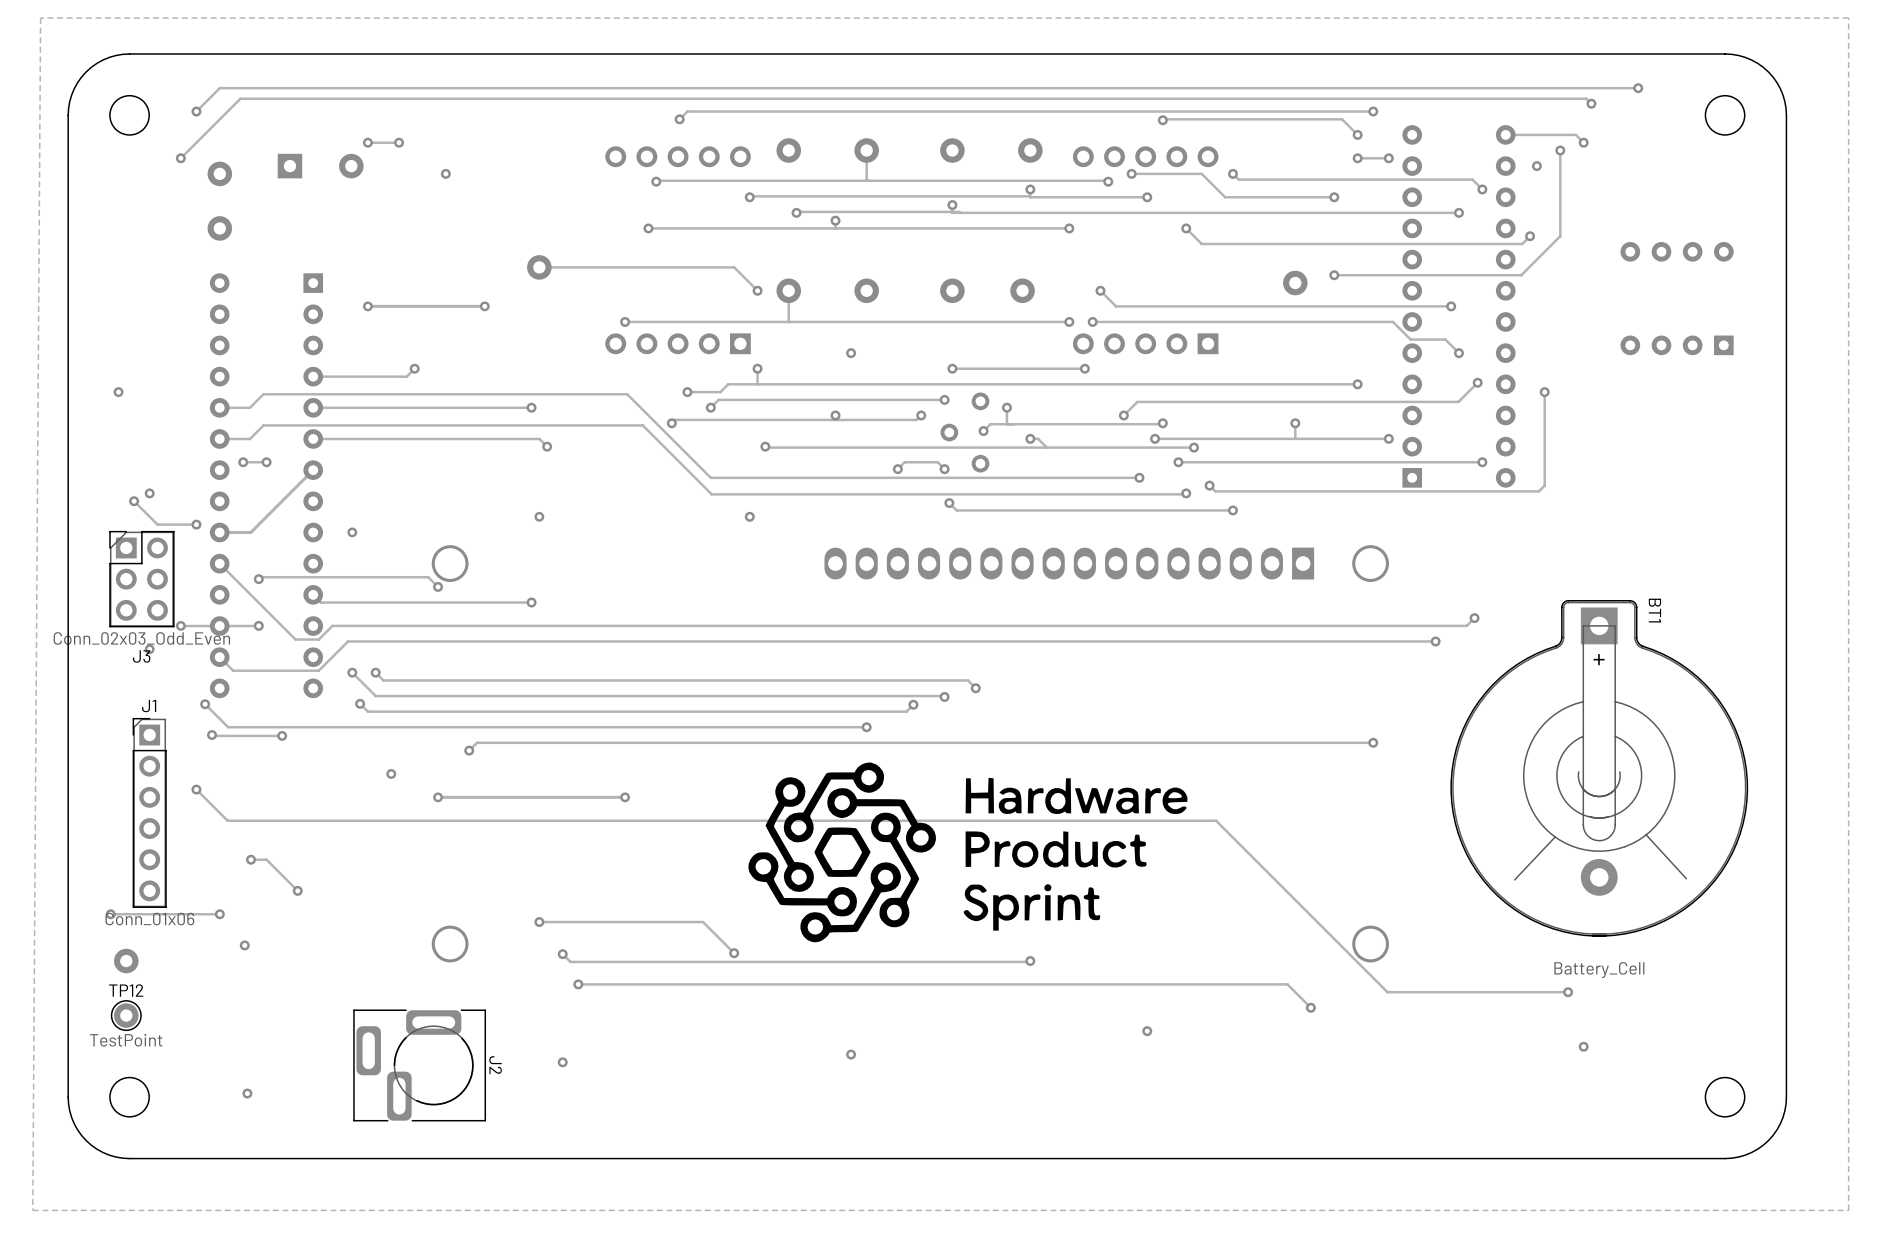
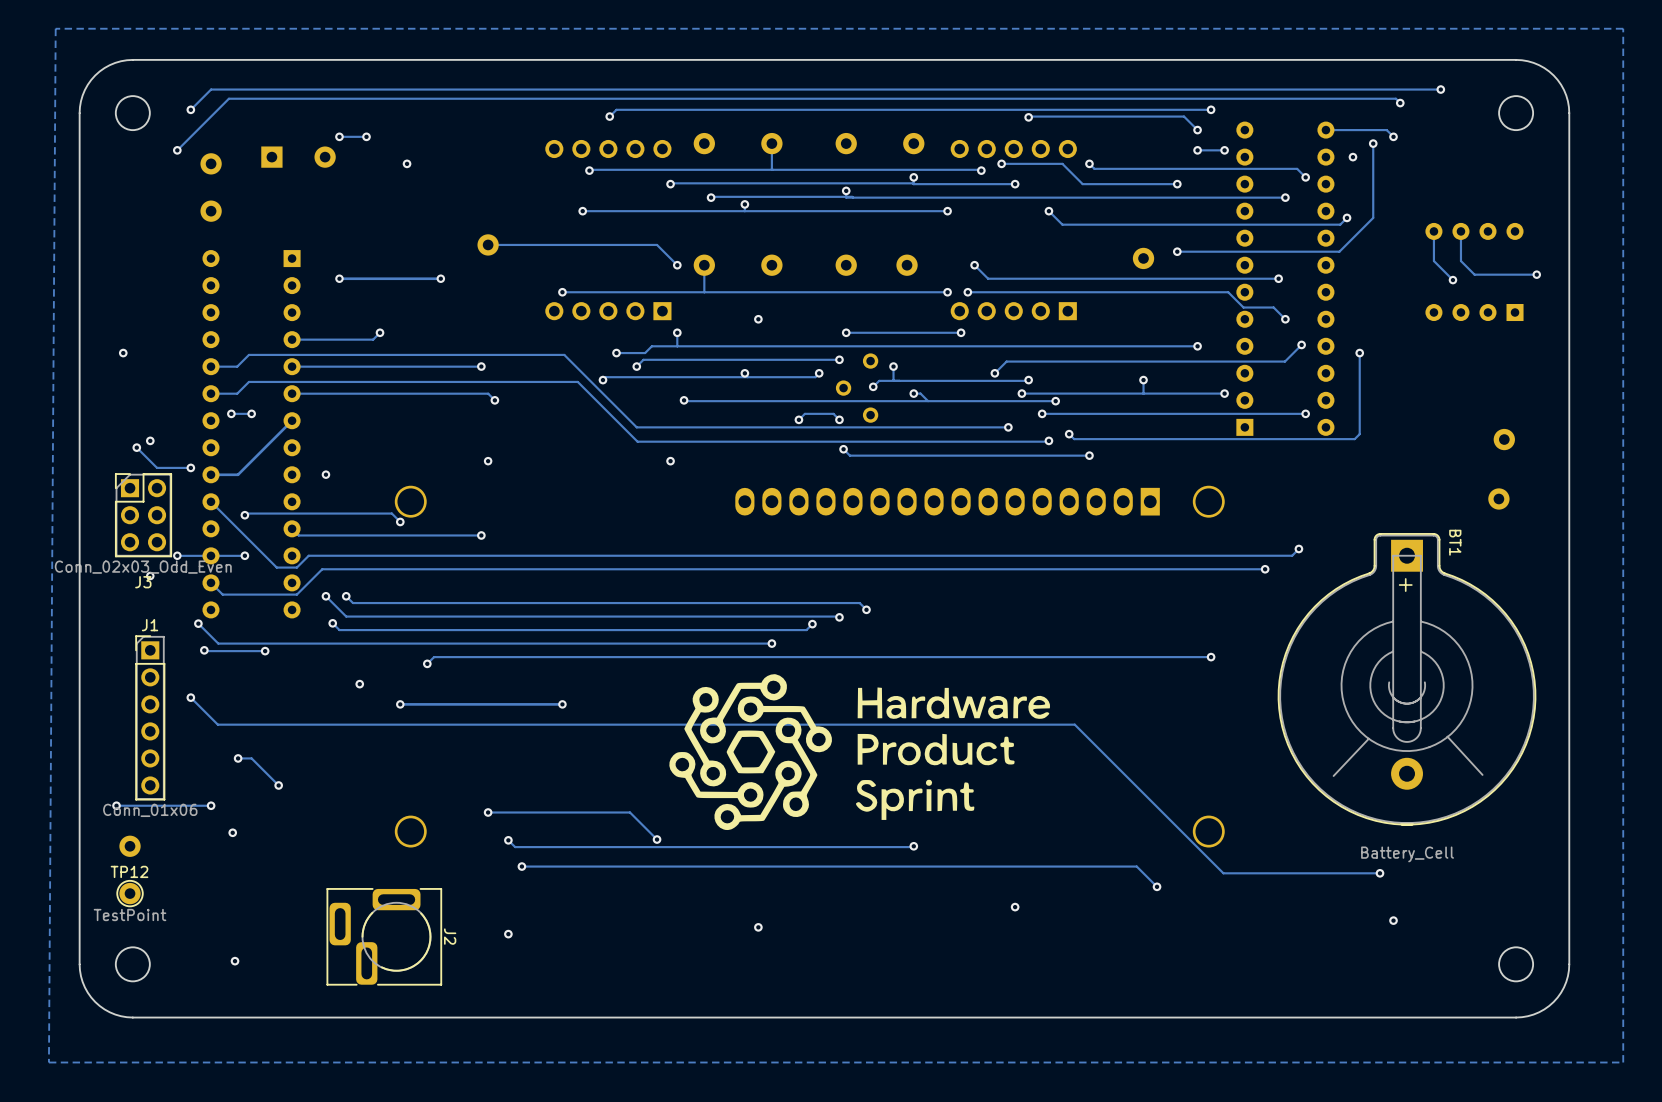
track: none -> (1433, 231) (1433, 261) (1452, 280)
track: none -> (1460, 231) (1460, 261) (1474, 274) (1536, 274)
via: none -> (1536, 274)
via: none -> (1452, 280)
part: none -> (1504, 439)
part: none -> (1498, 498)

